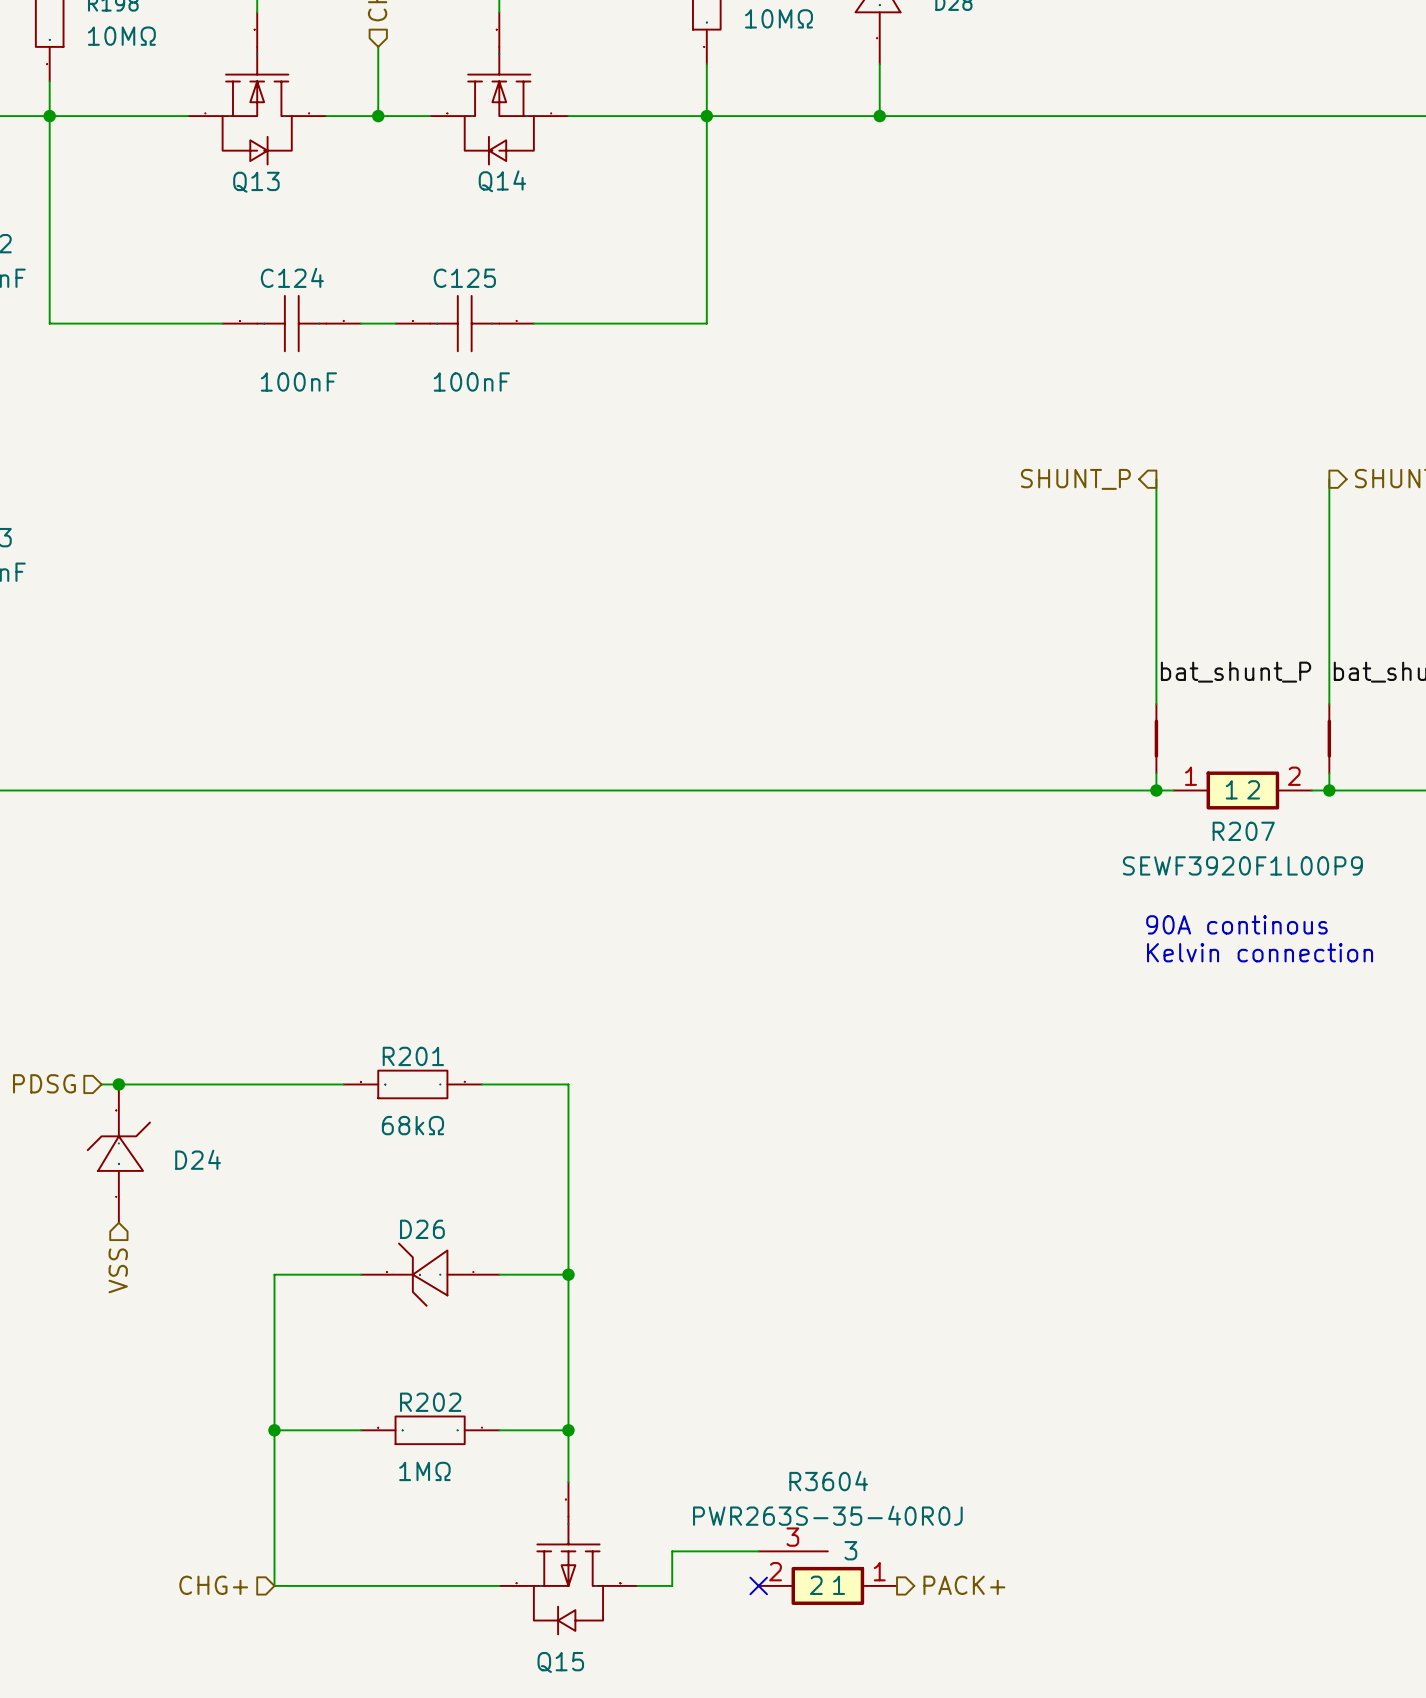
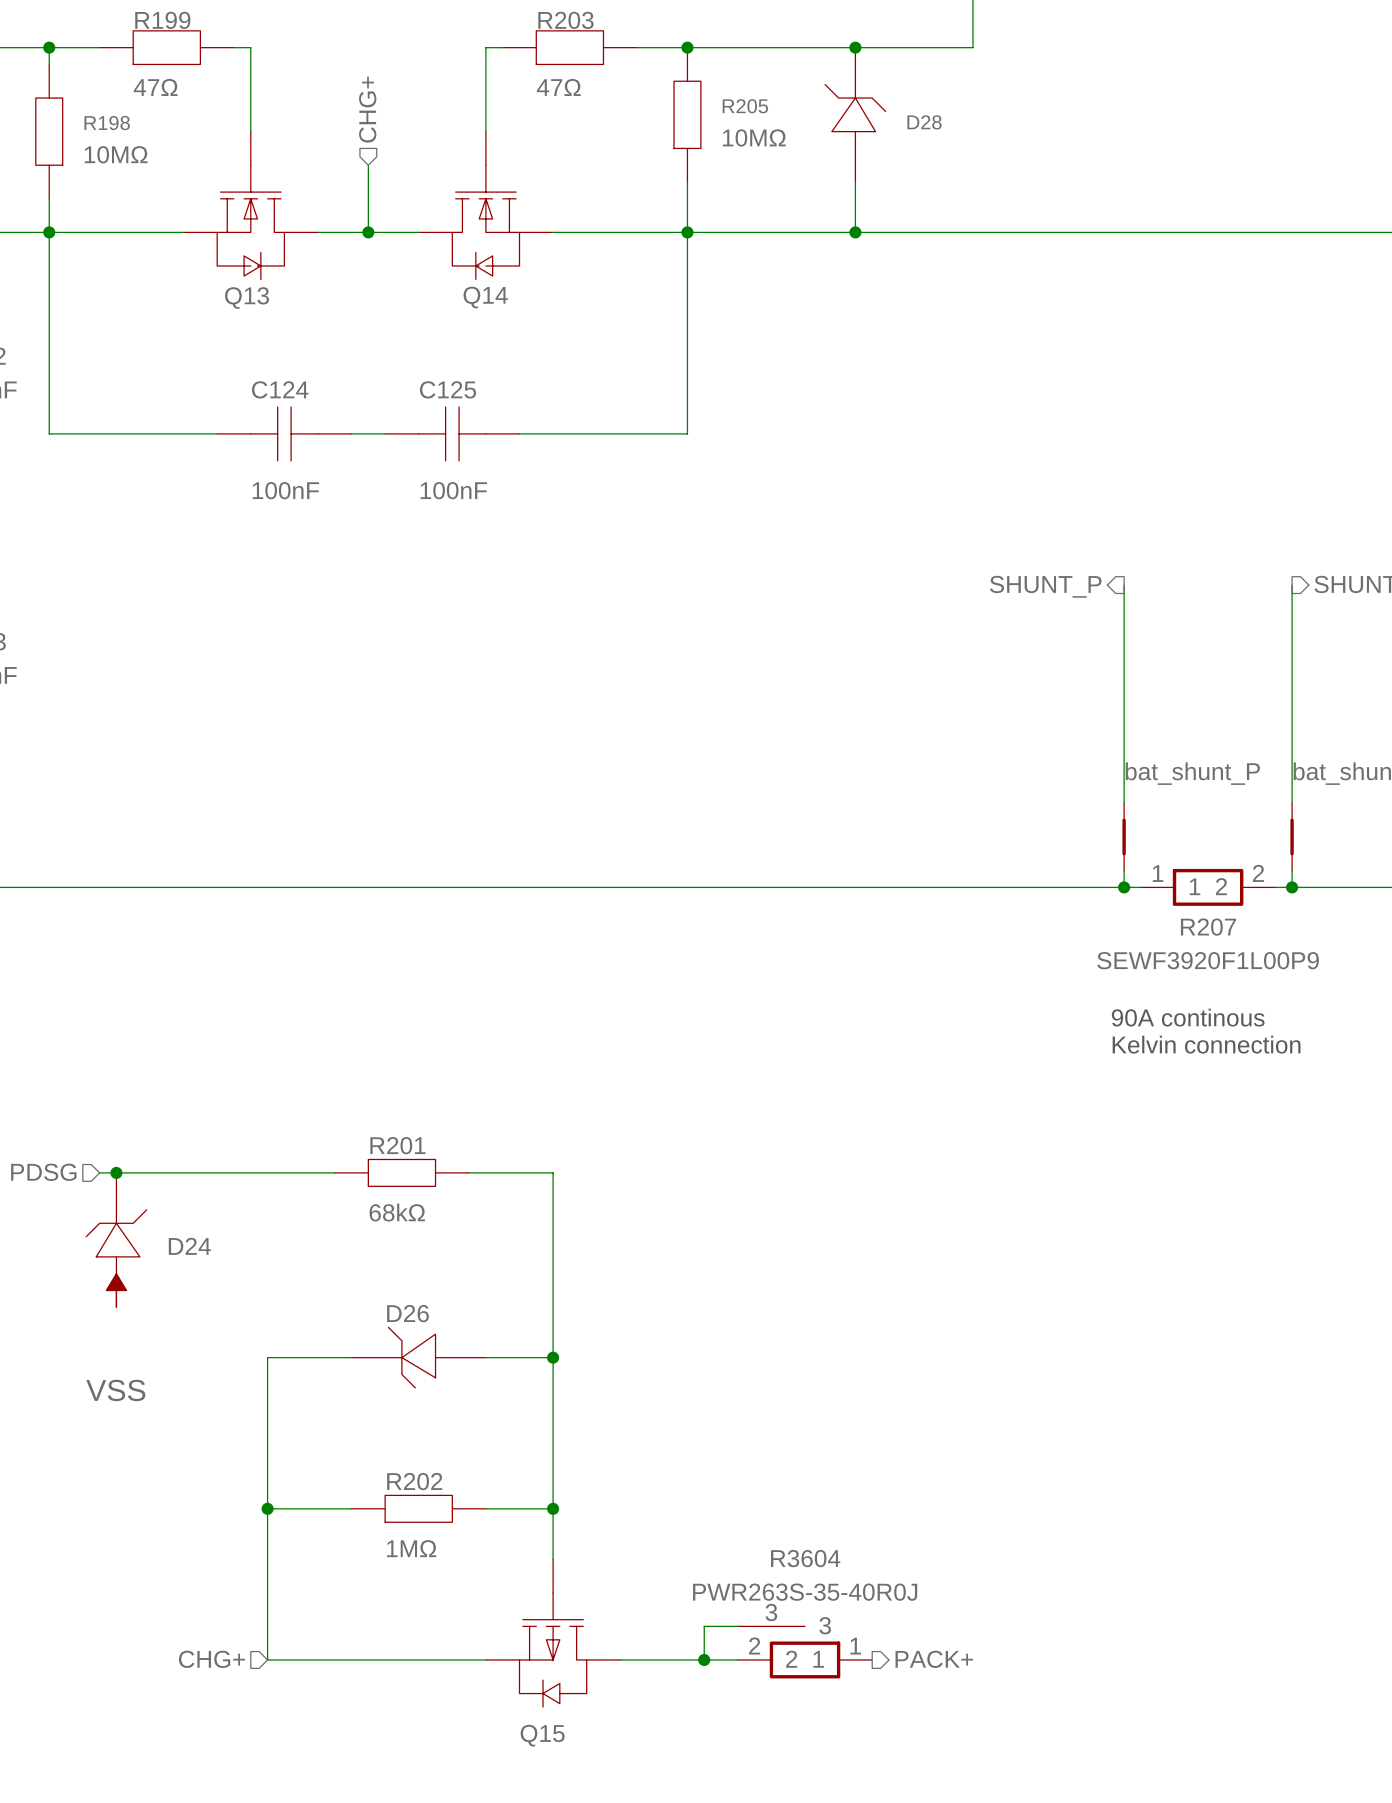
power symbol: none -> VSS (116, 1290)
hierarchical label: VSS (118, 1270) -> none
wire: (724, 1551) (672, 1551) (672, 1585) -> (737, 1659) (653, 1659)
wire: none -> (704, 1626) (704, 1659)
junction: none -> (704, 1659)
no-connect mark: (758, 1585) -> none

